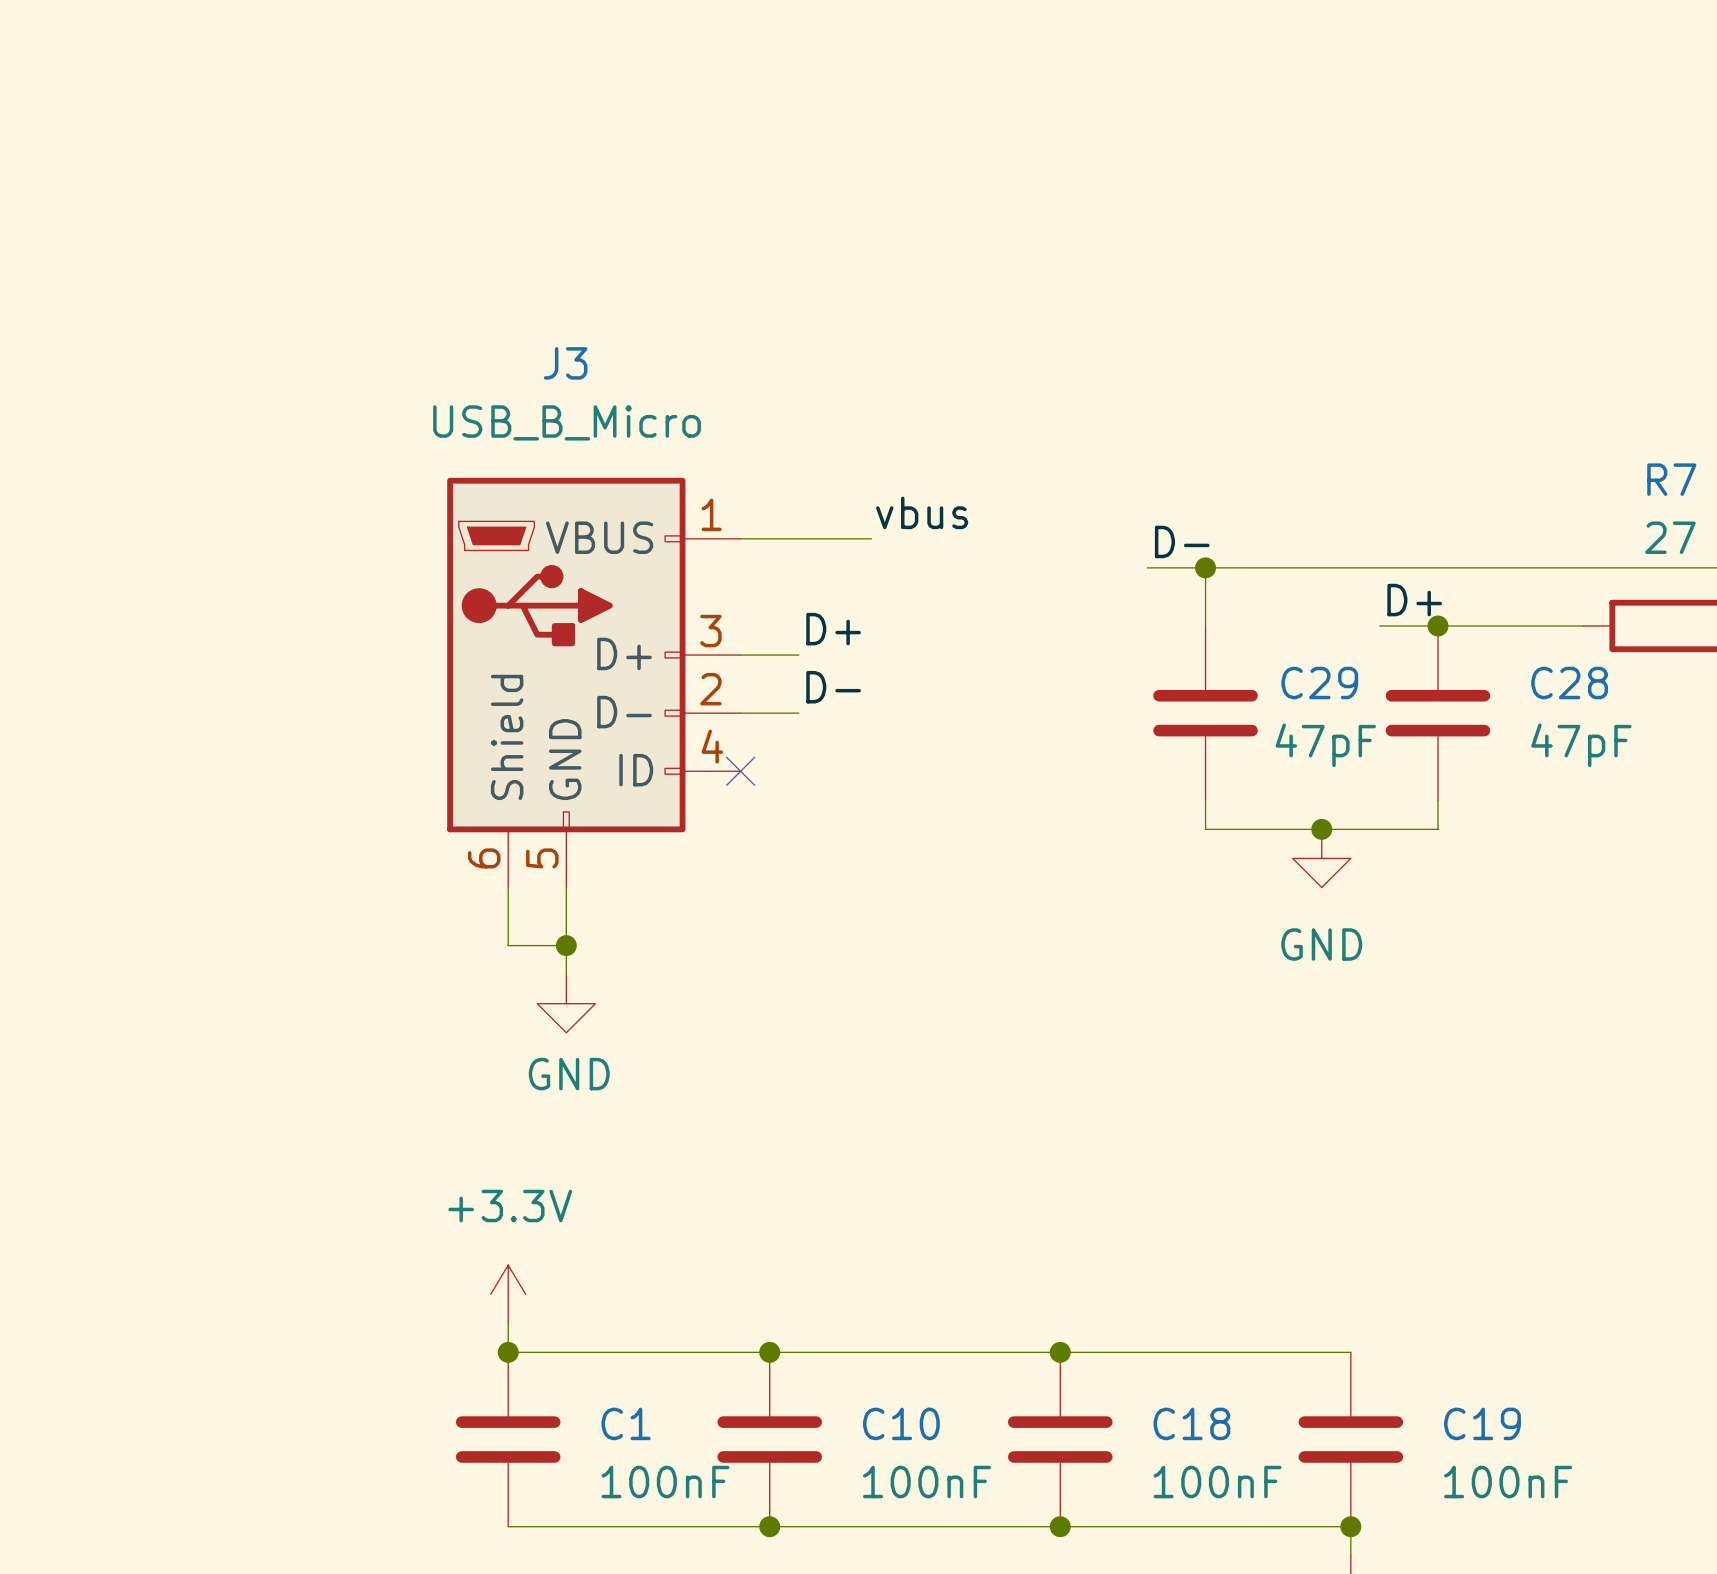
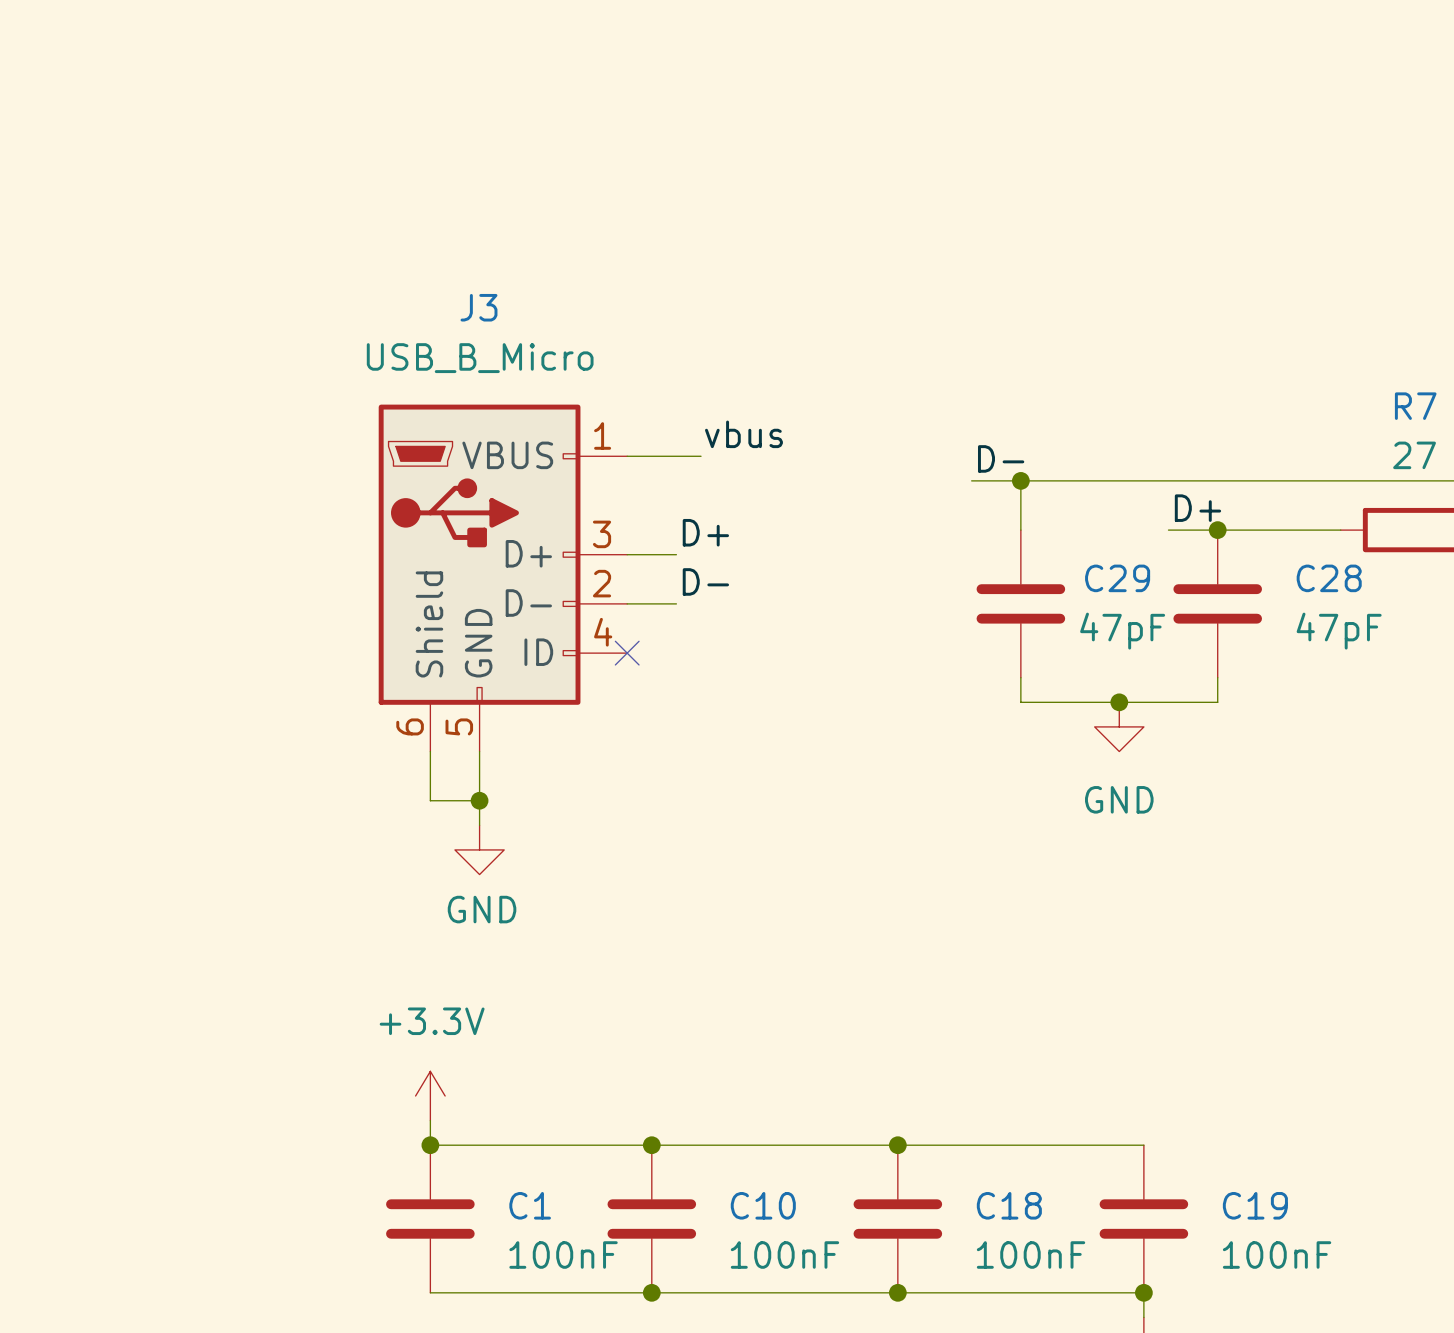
label position: vbus (922, 512) -> vbus (743, 434)
wire: (827, 538) (871, 538) -> none

